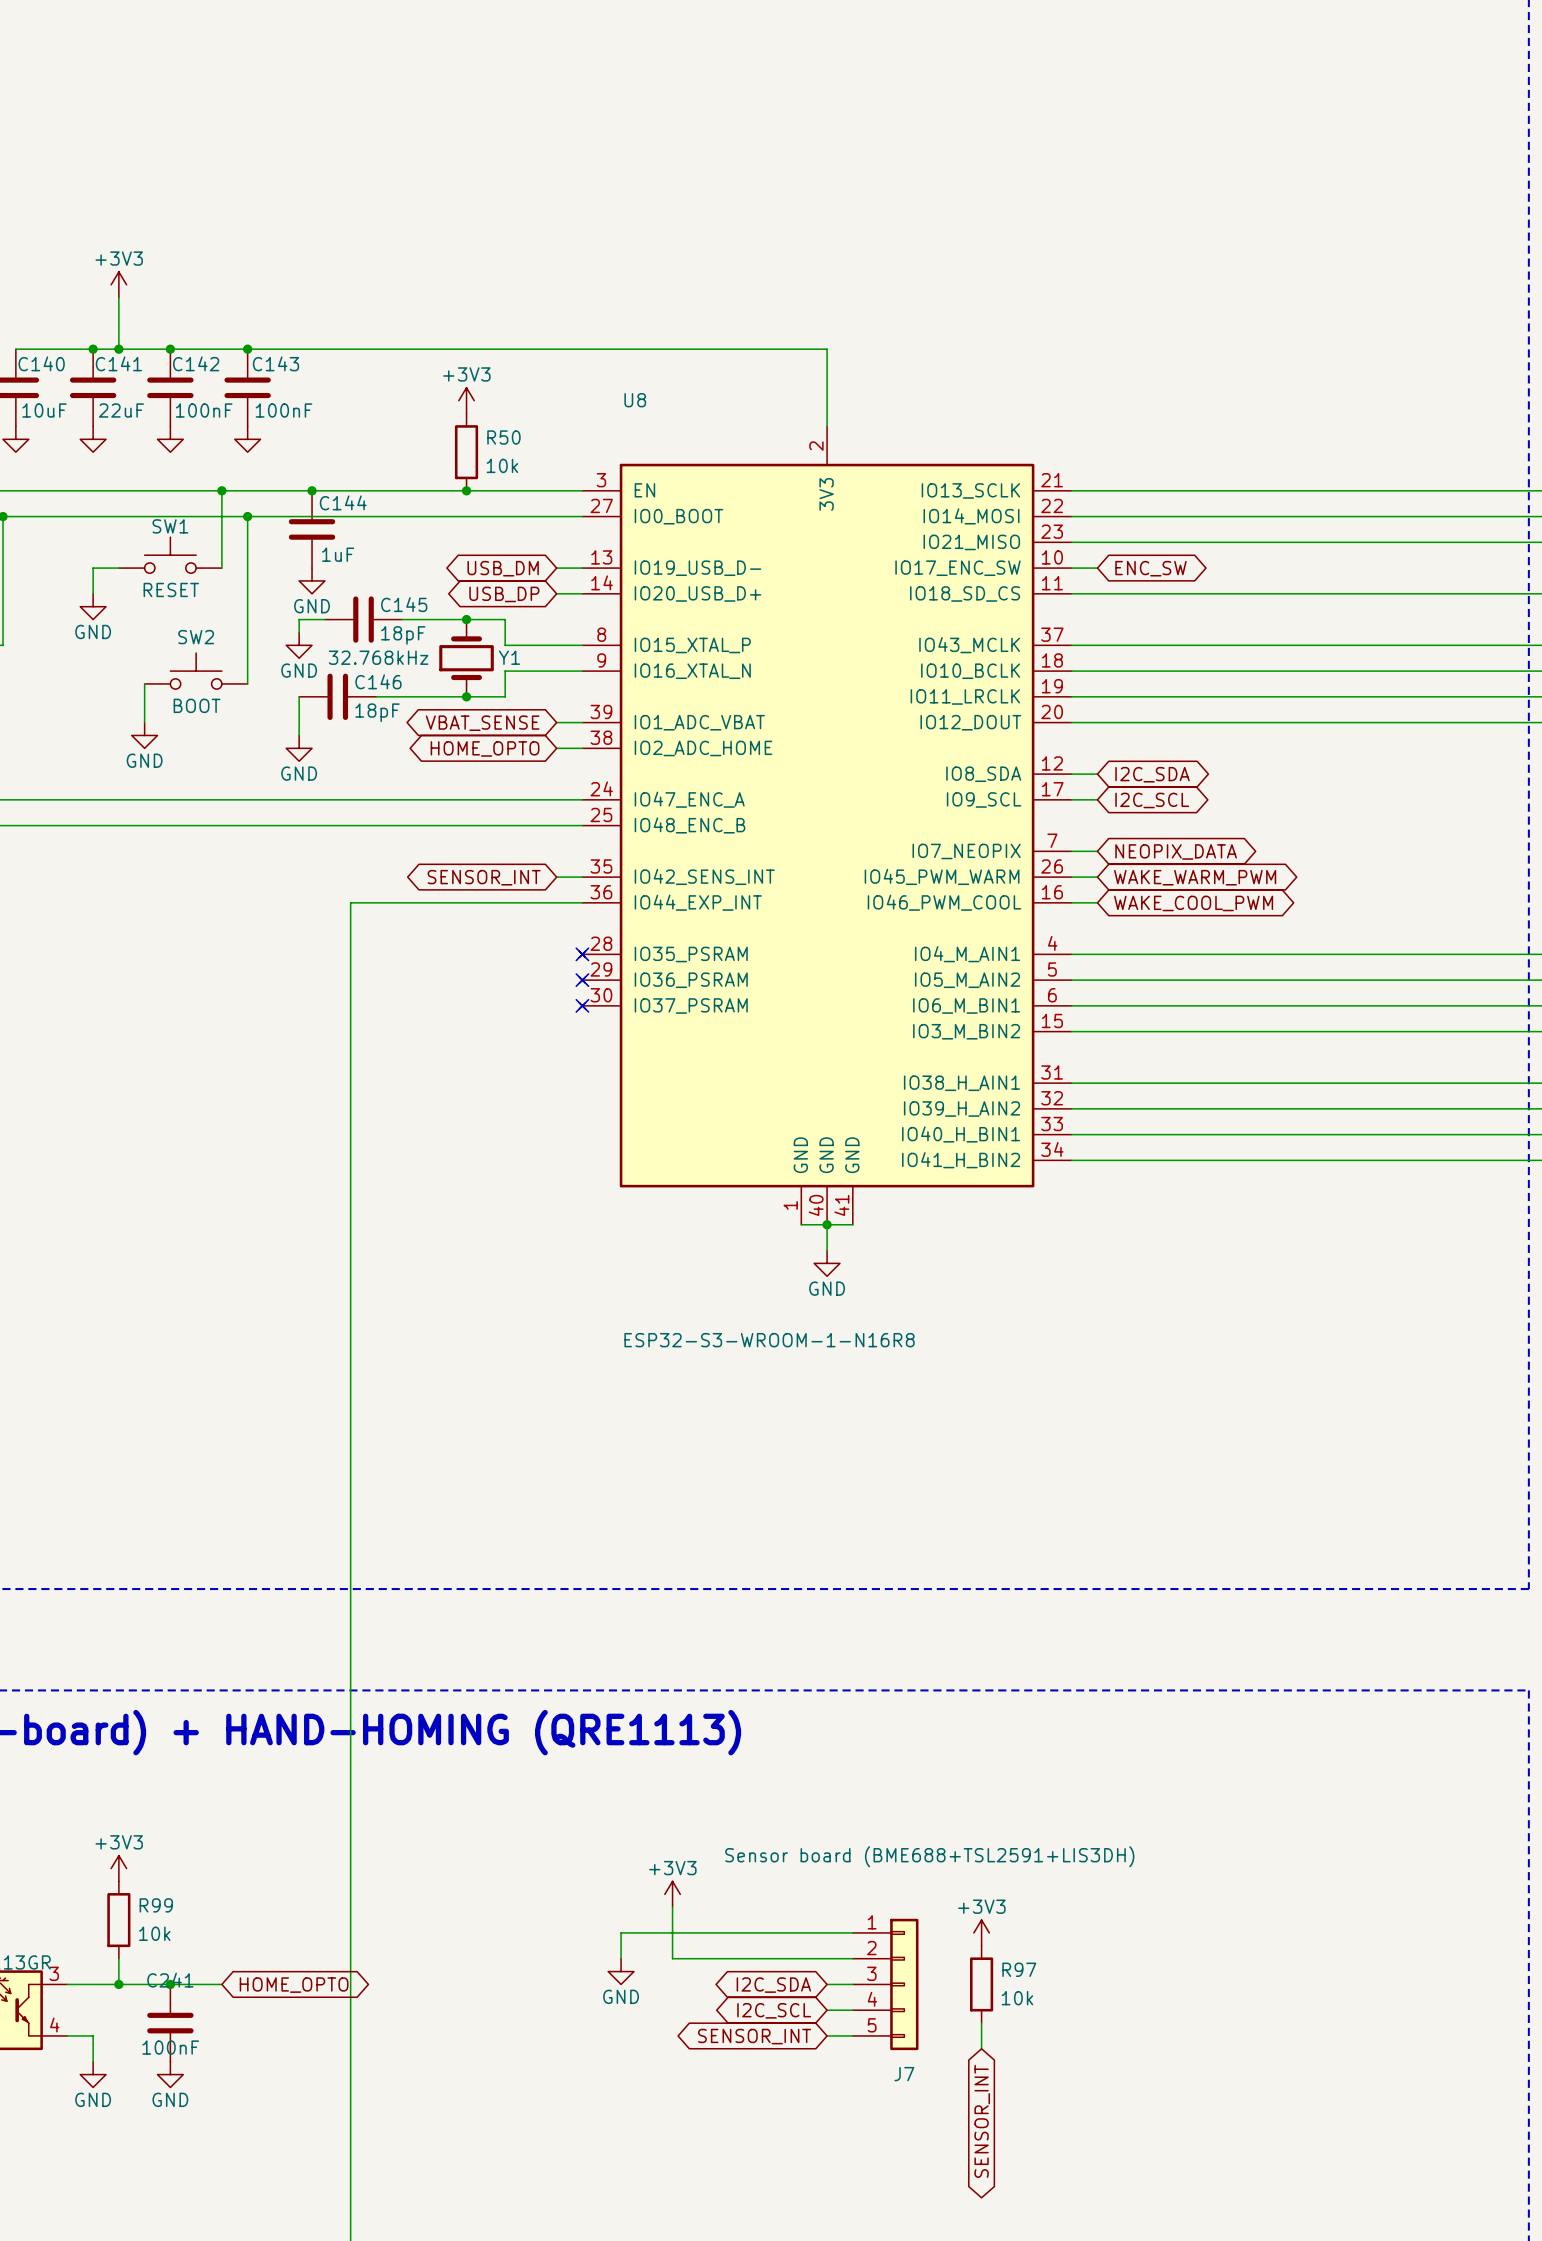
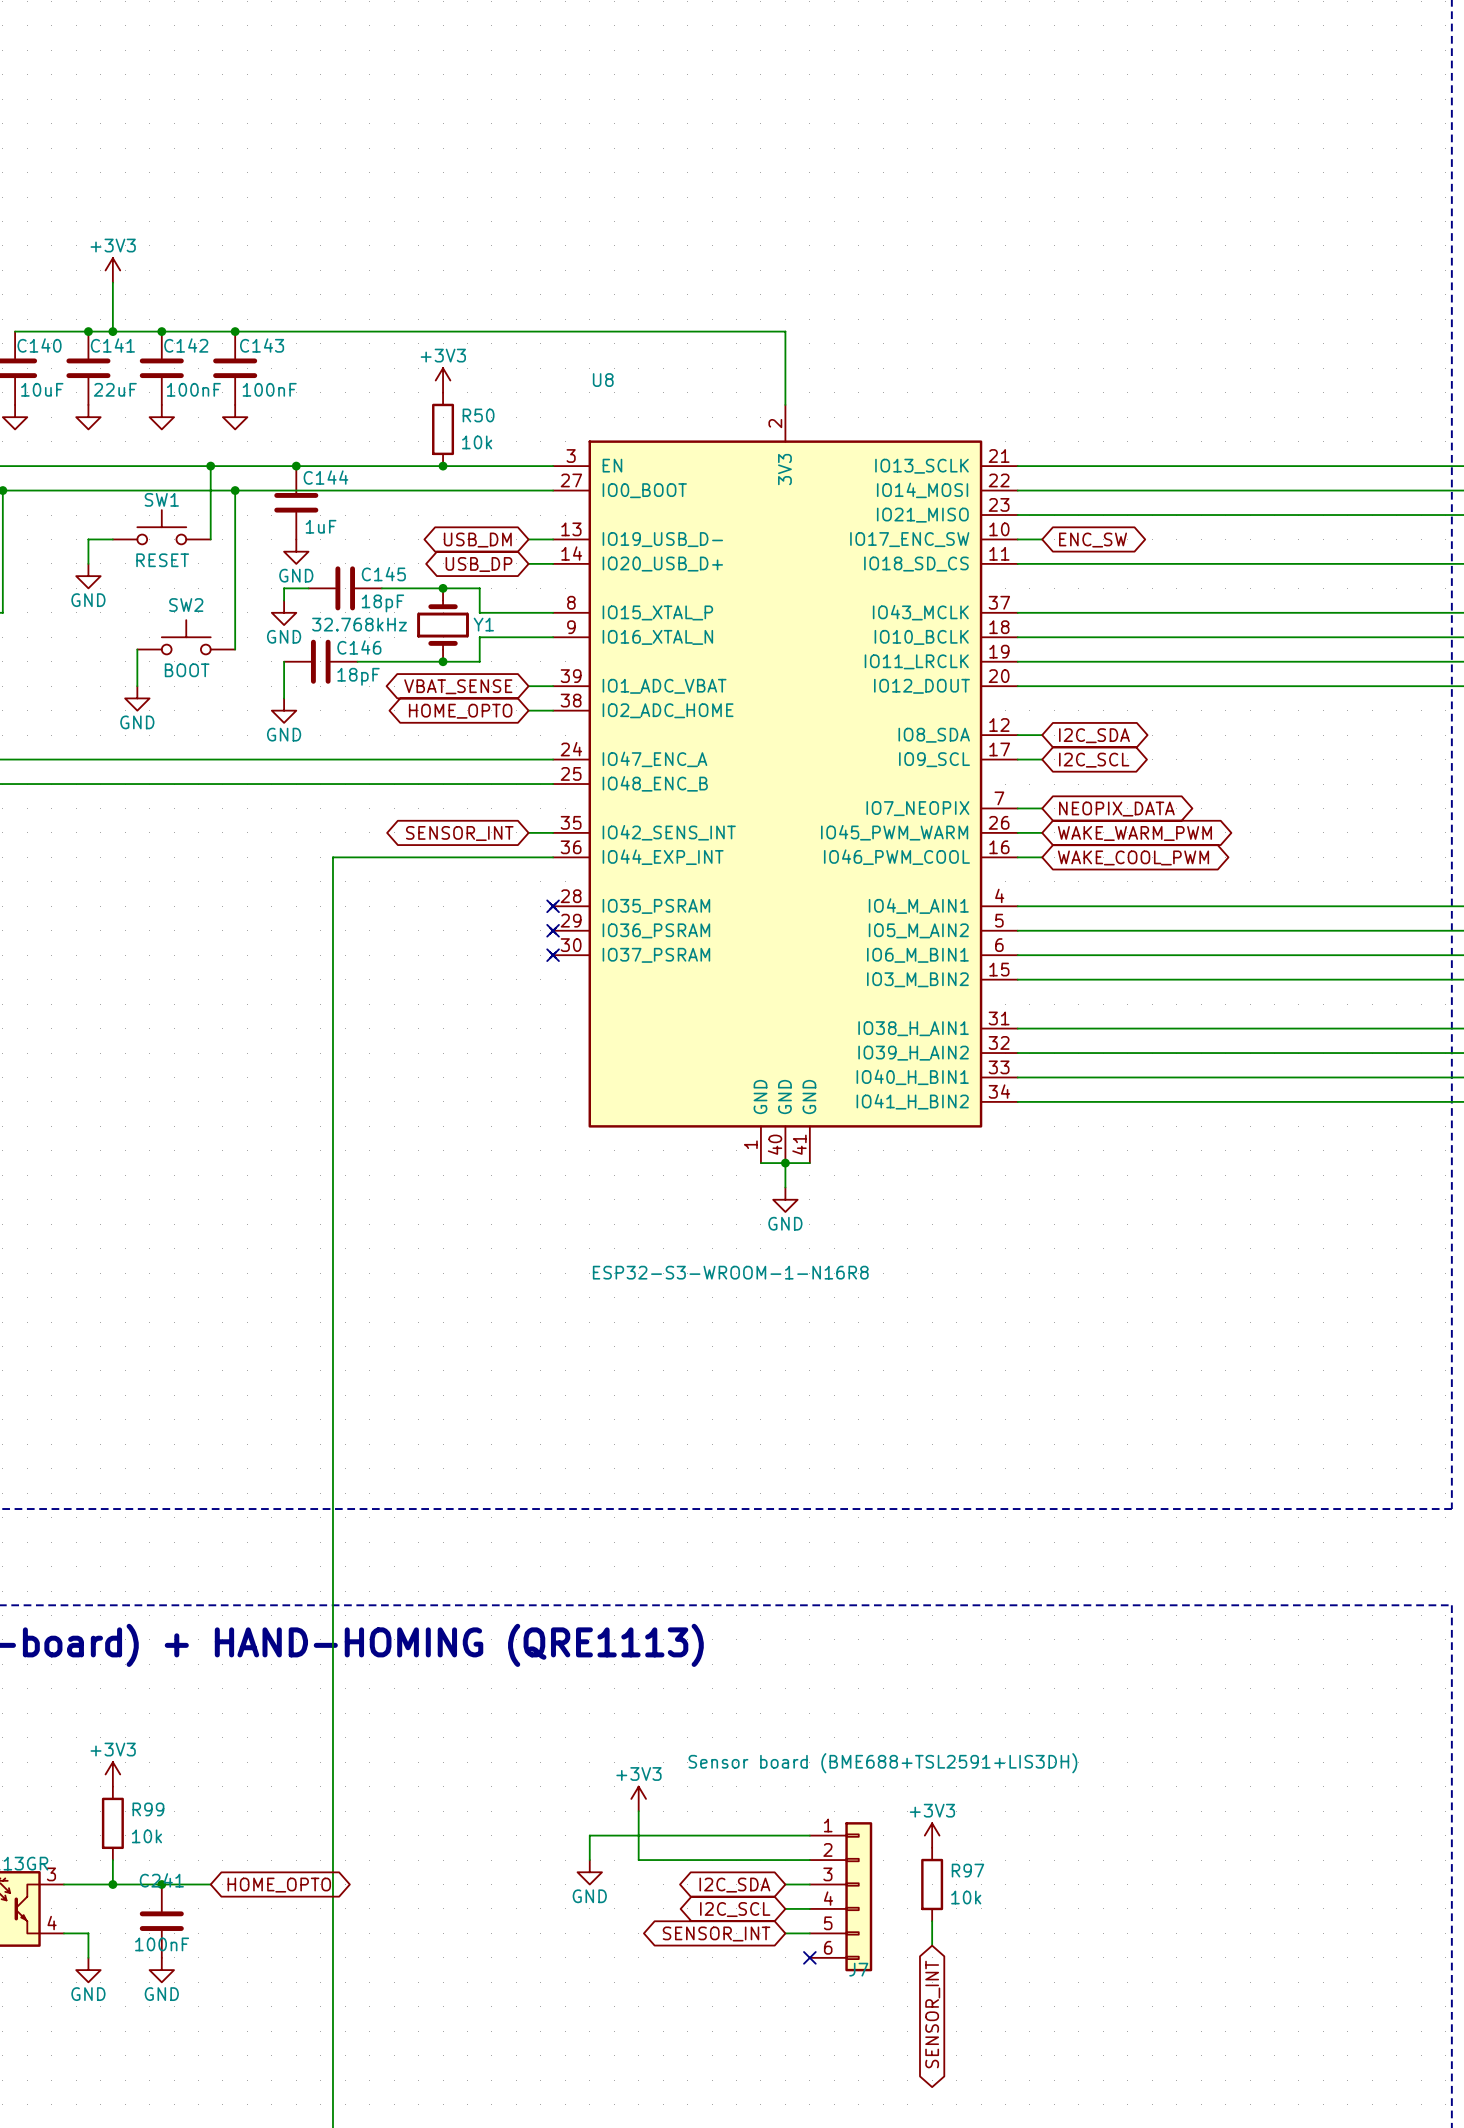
J7 symbol: [852, 1918, 919, 2051] -> [809, 1822, 873, 1972]
no-connect mark: none -> (809, 1957)

